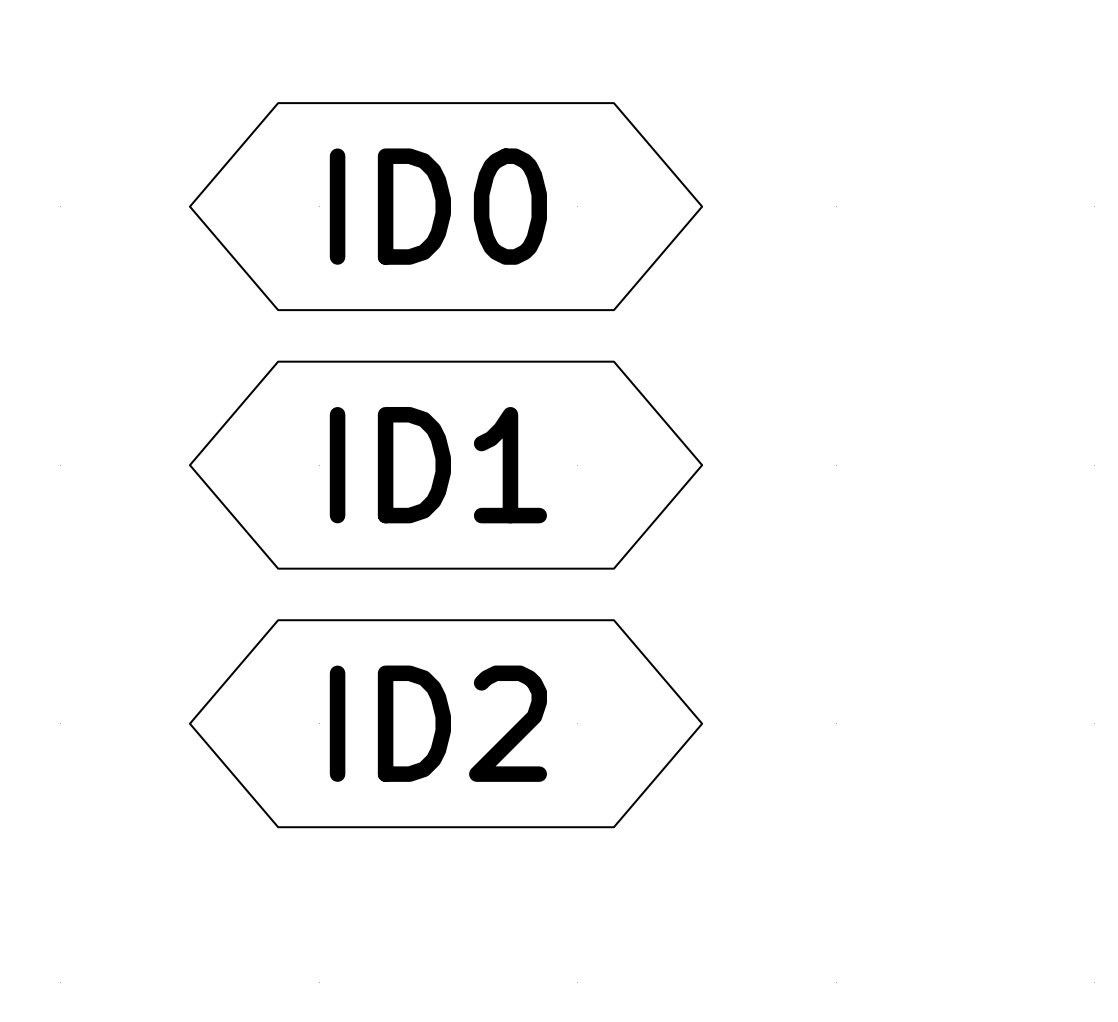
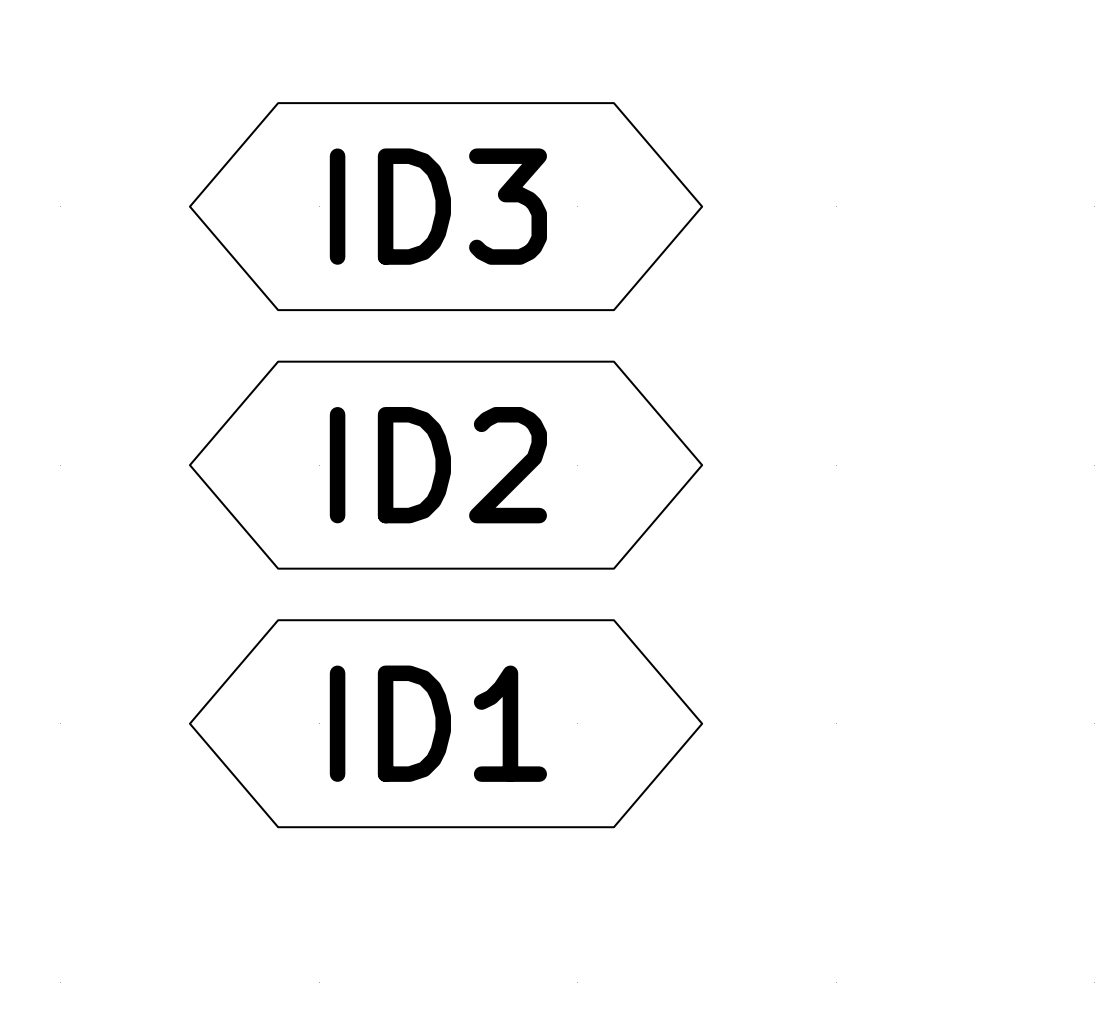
global label: ID0 (438, 206) -> ID3 (438, 206)
global label: ID1 (438, 465) -> ID2 (438, 465)
global label: ID2 (438, 723) -> ID1 (438, 723)

